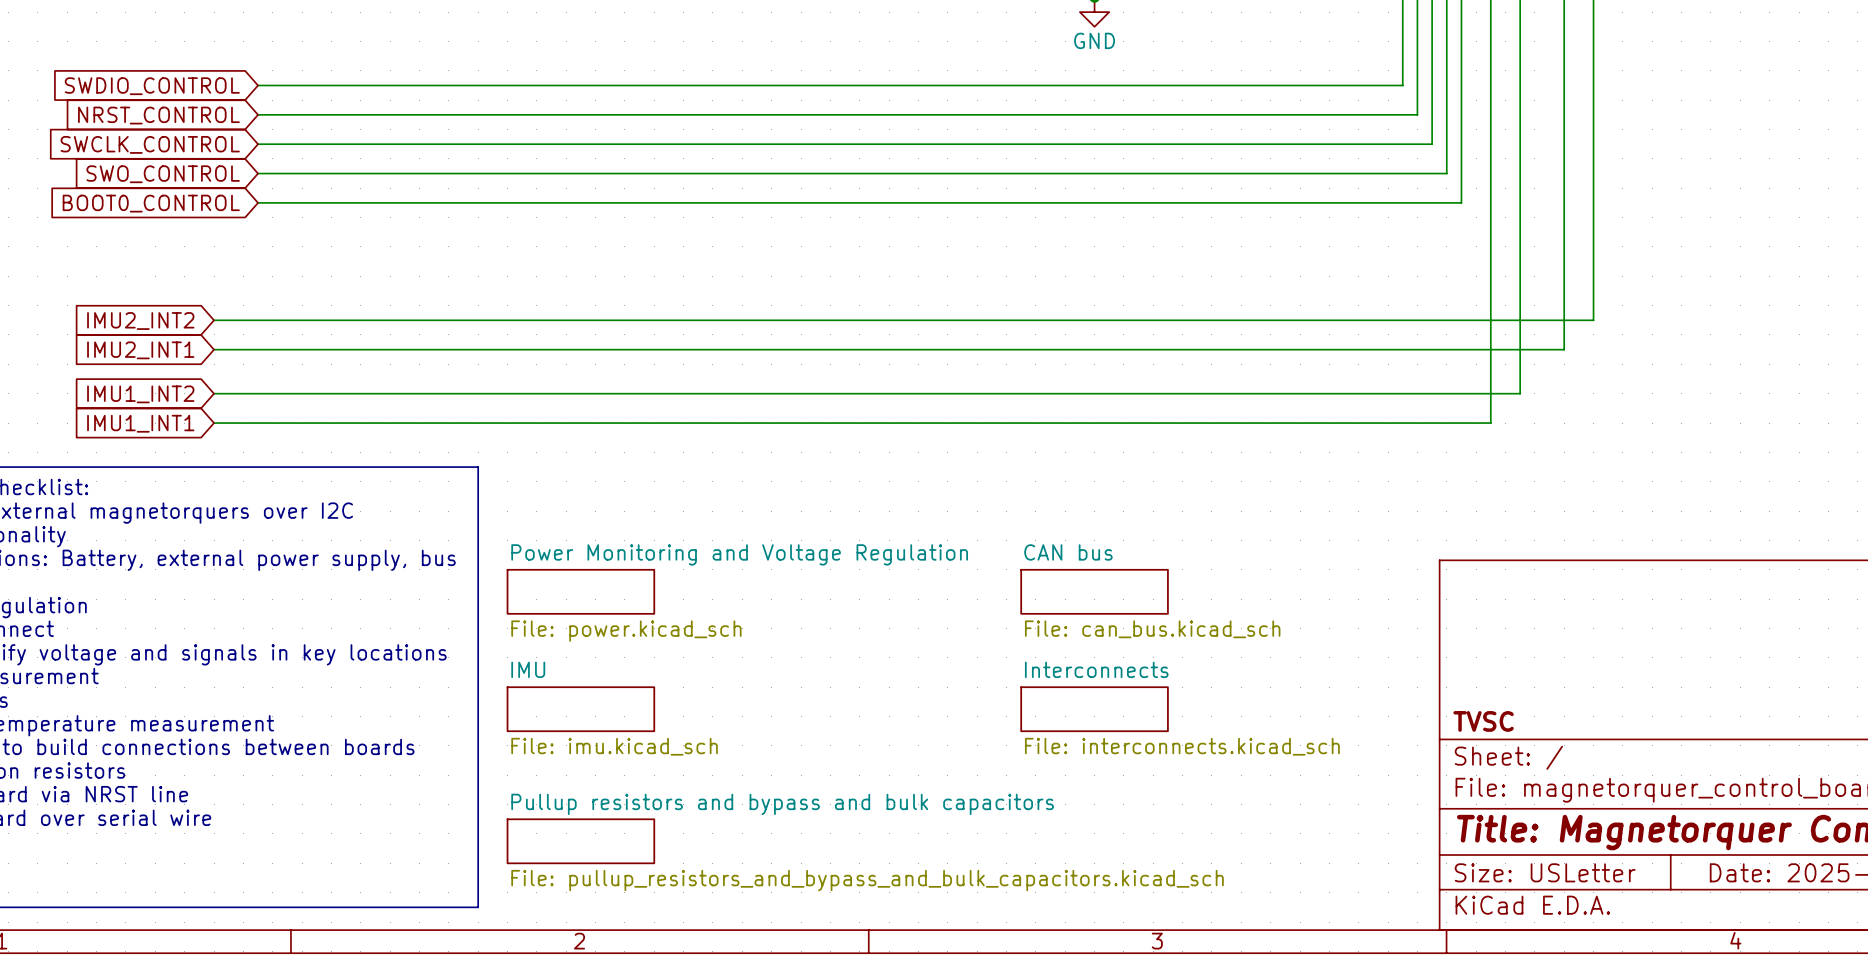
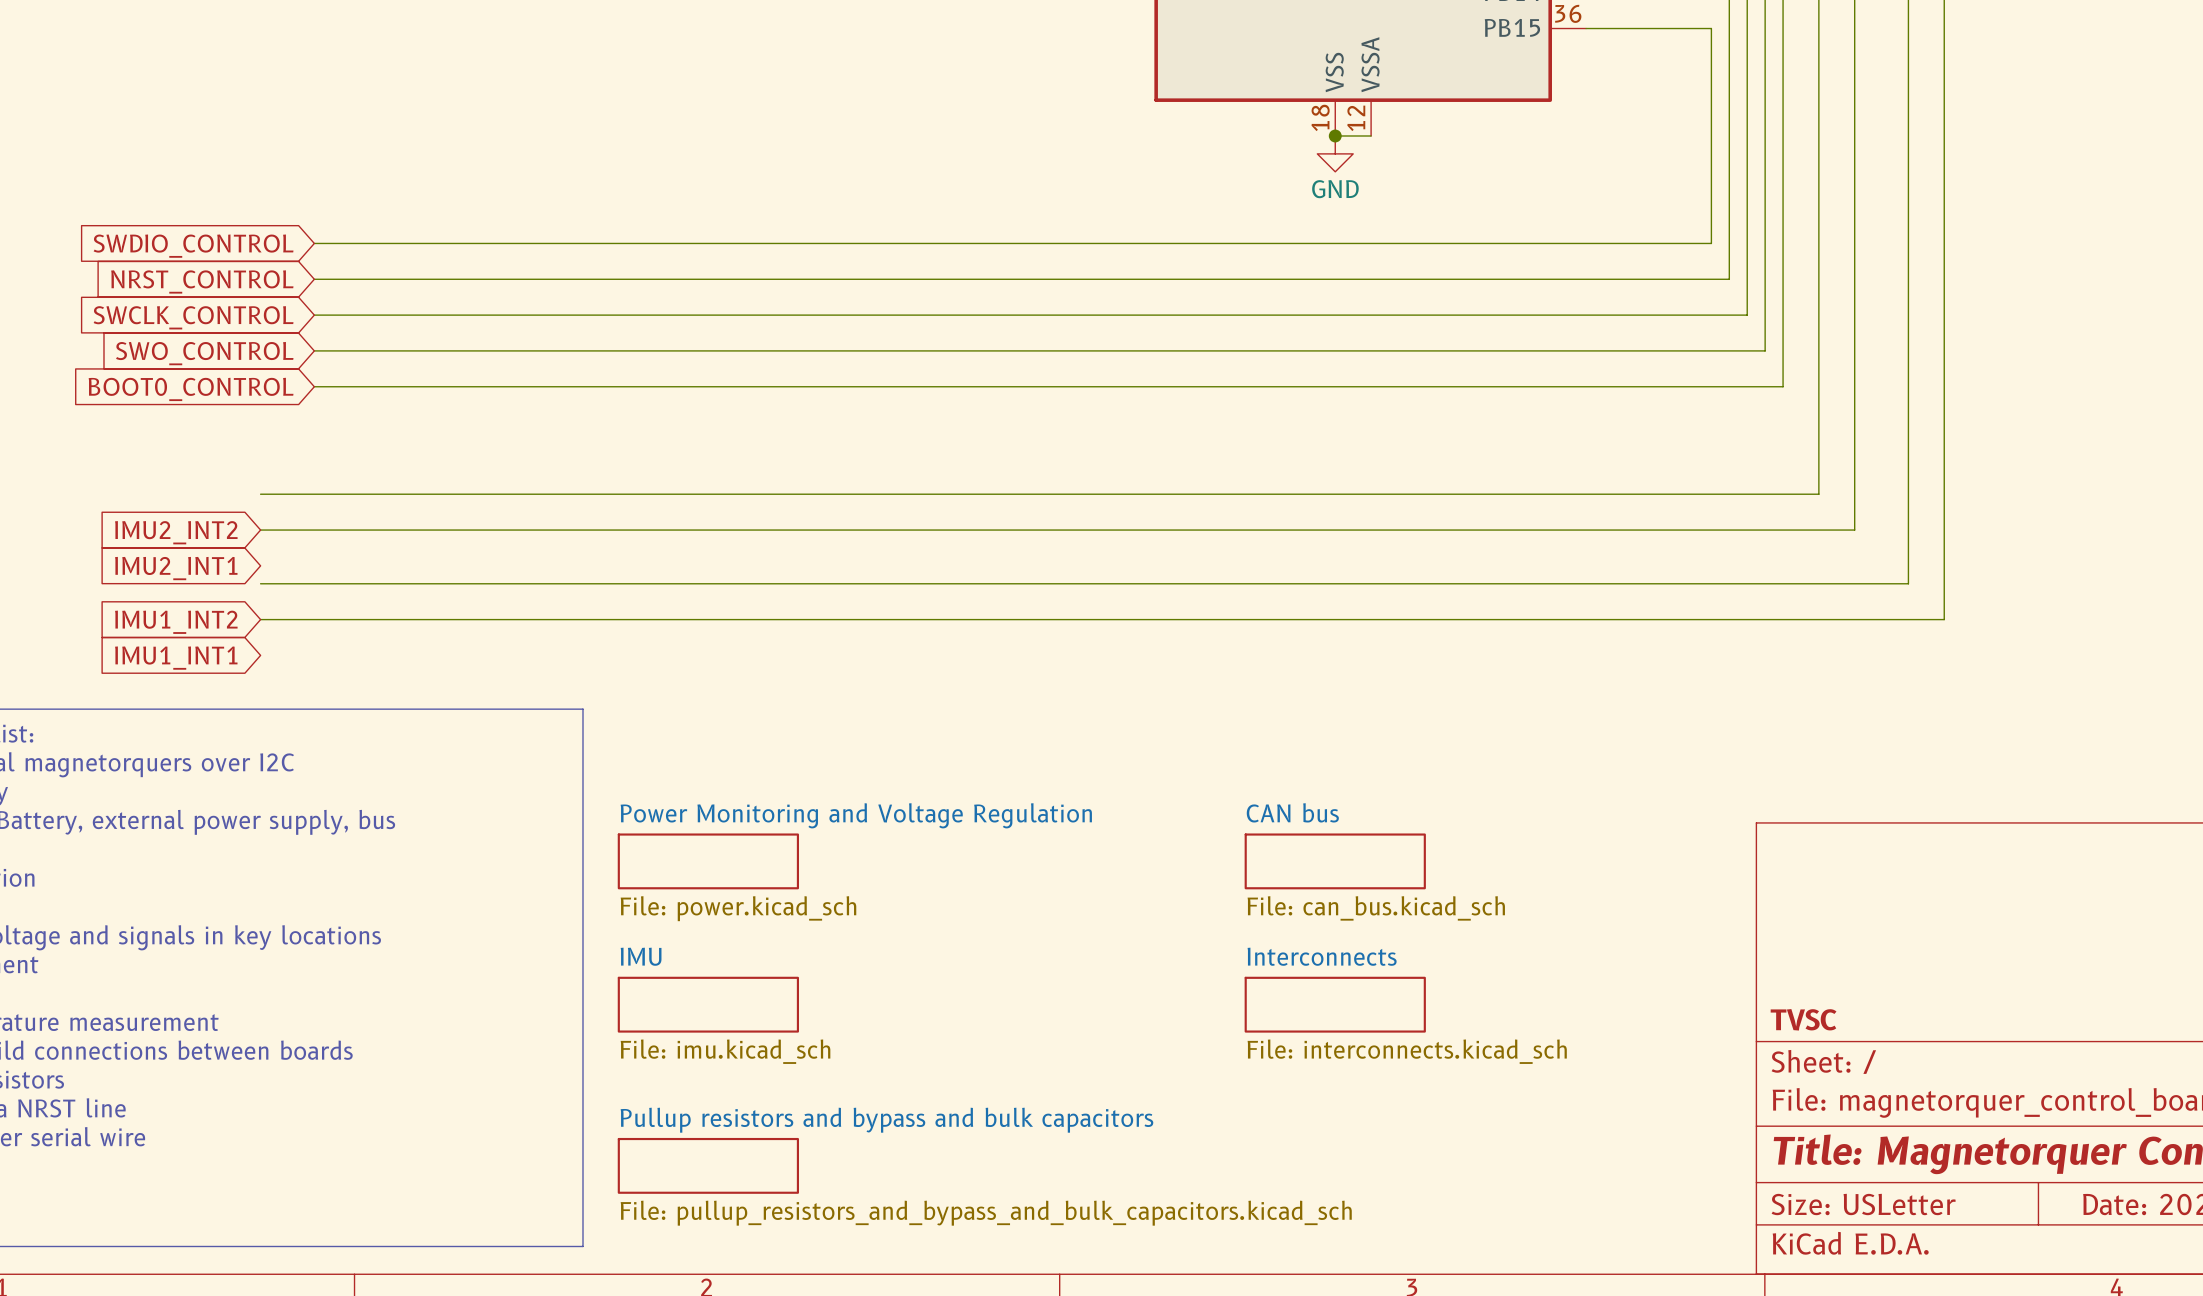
wire: (1490, 290) (1490, 423) (214, 423) -> (1818, 494) (260, 494)
wire: (1593, 320) (1520, 320) (1520, 393) -> (1944, 530) (1944, 619) (1854, 619)
wire: (214, 349) (1564, 349) -> (260, 583) (1908, 583) (1908, 565)

